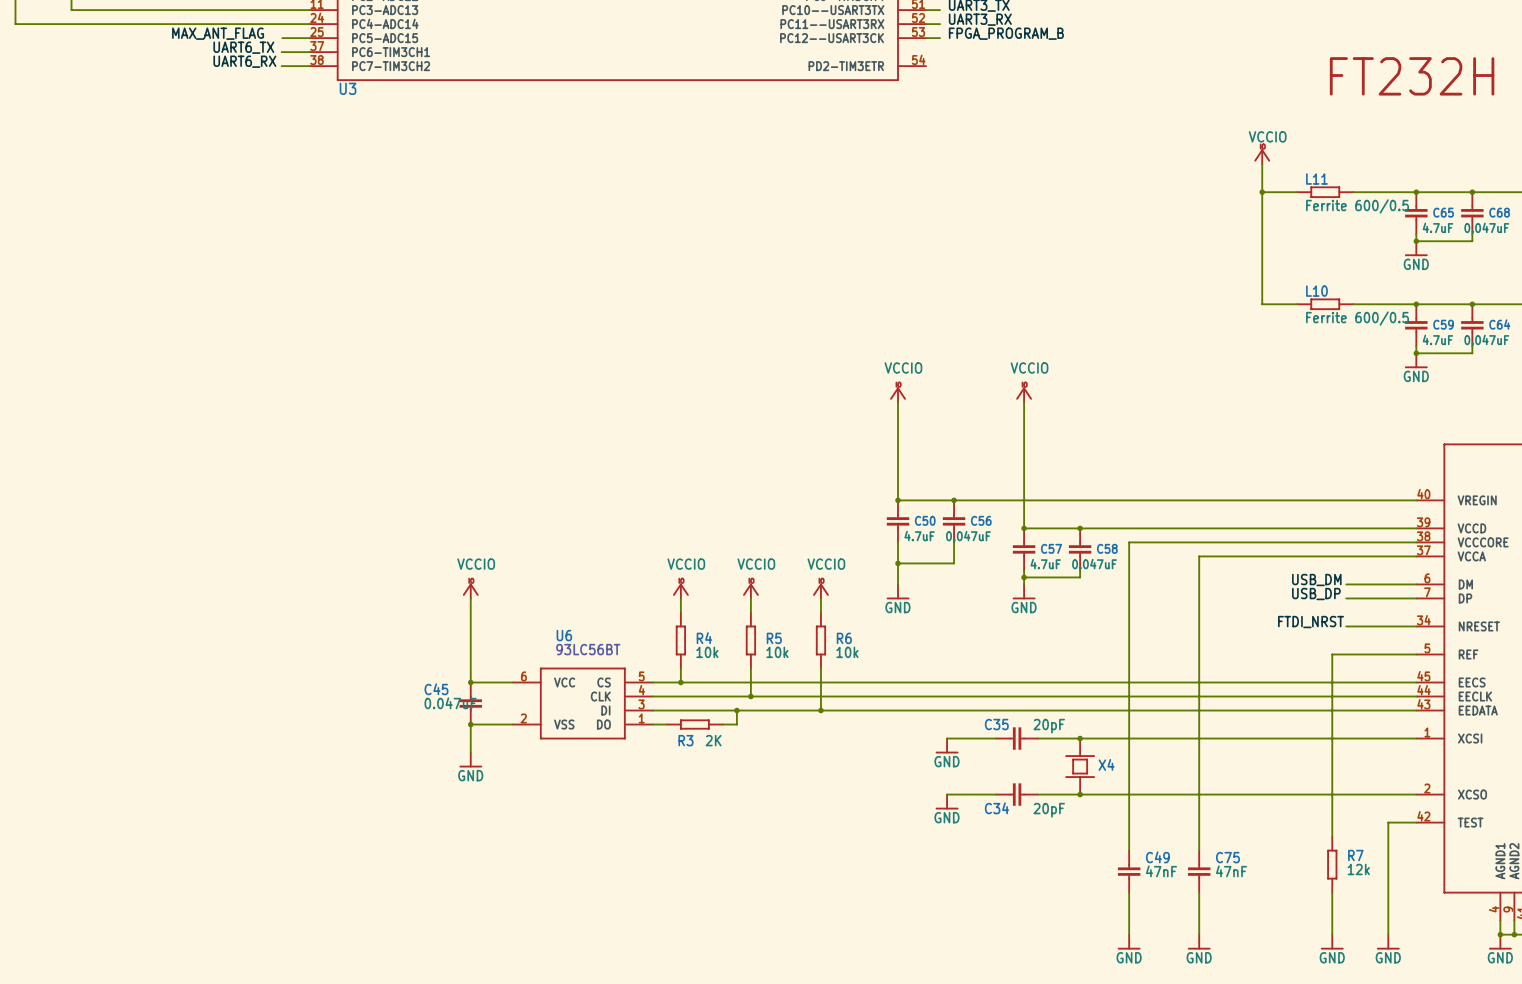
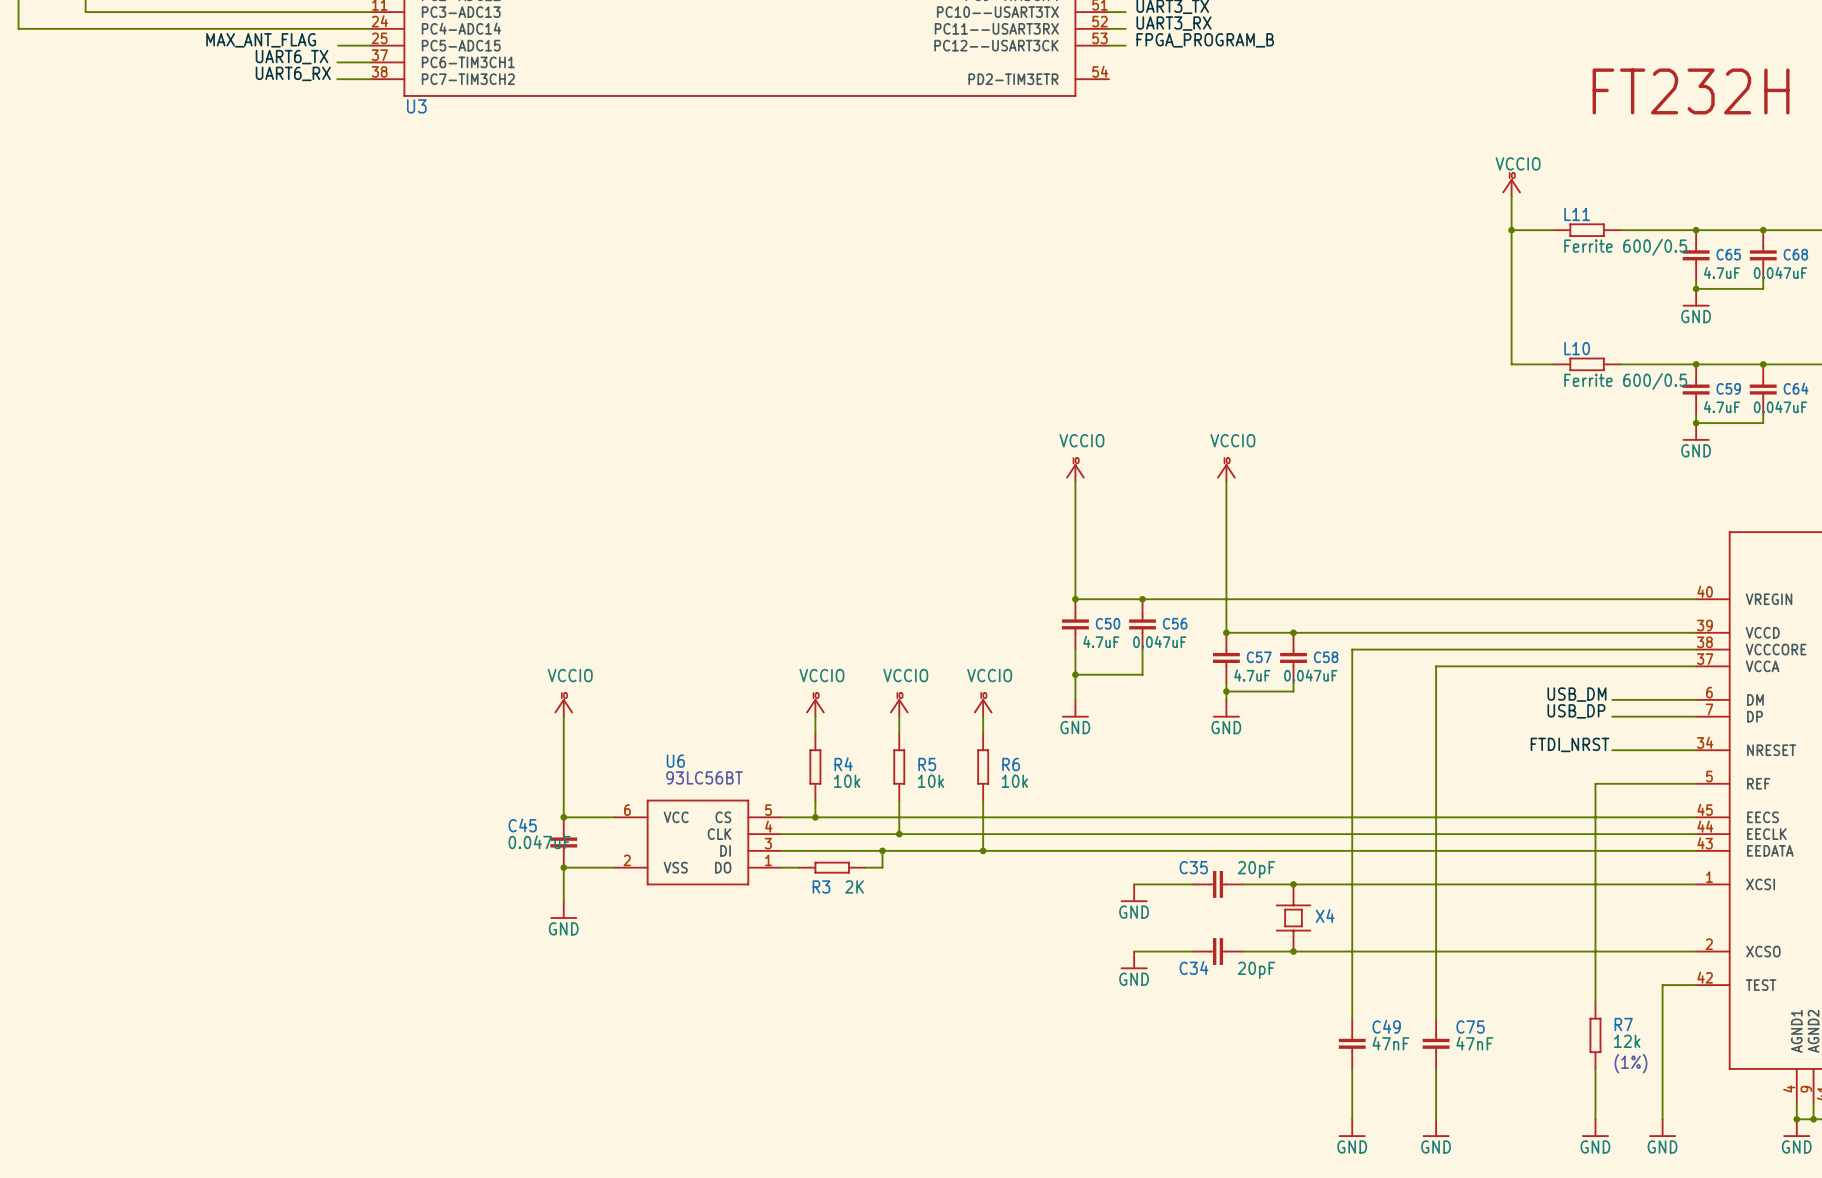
text: none -> (1%) (1630, 1063)

